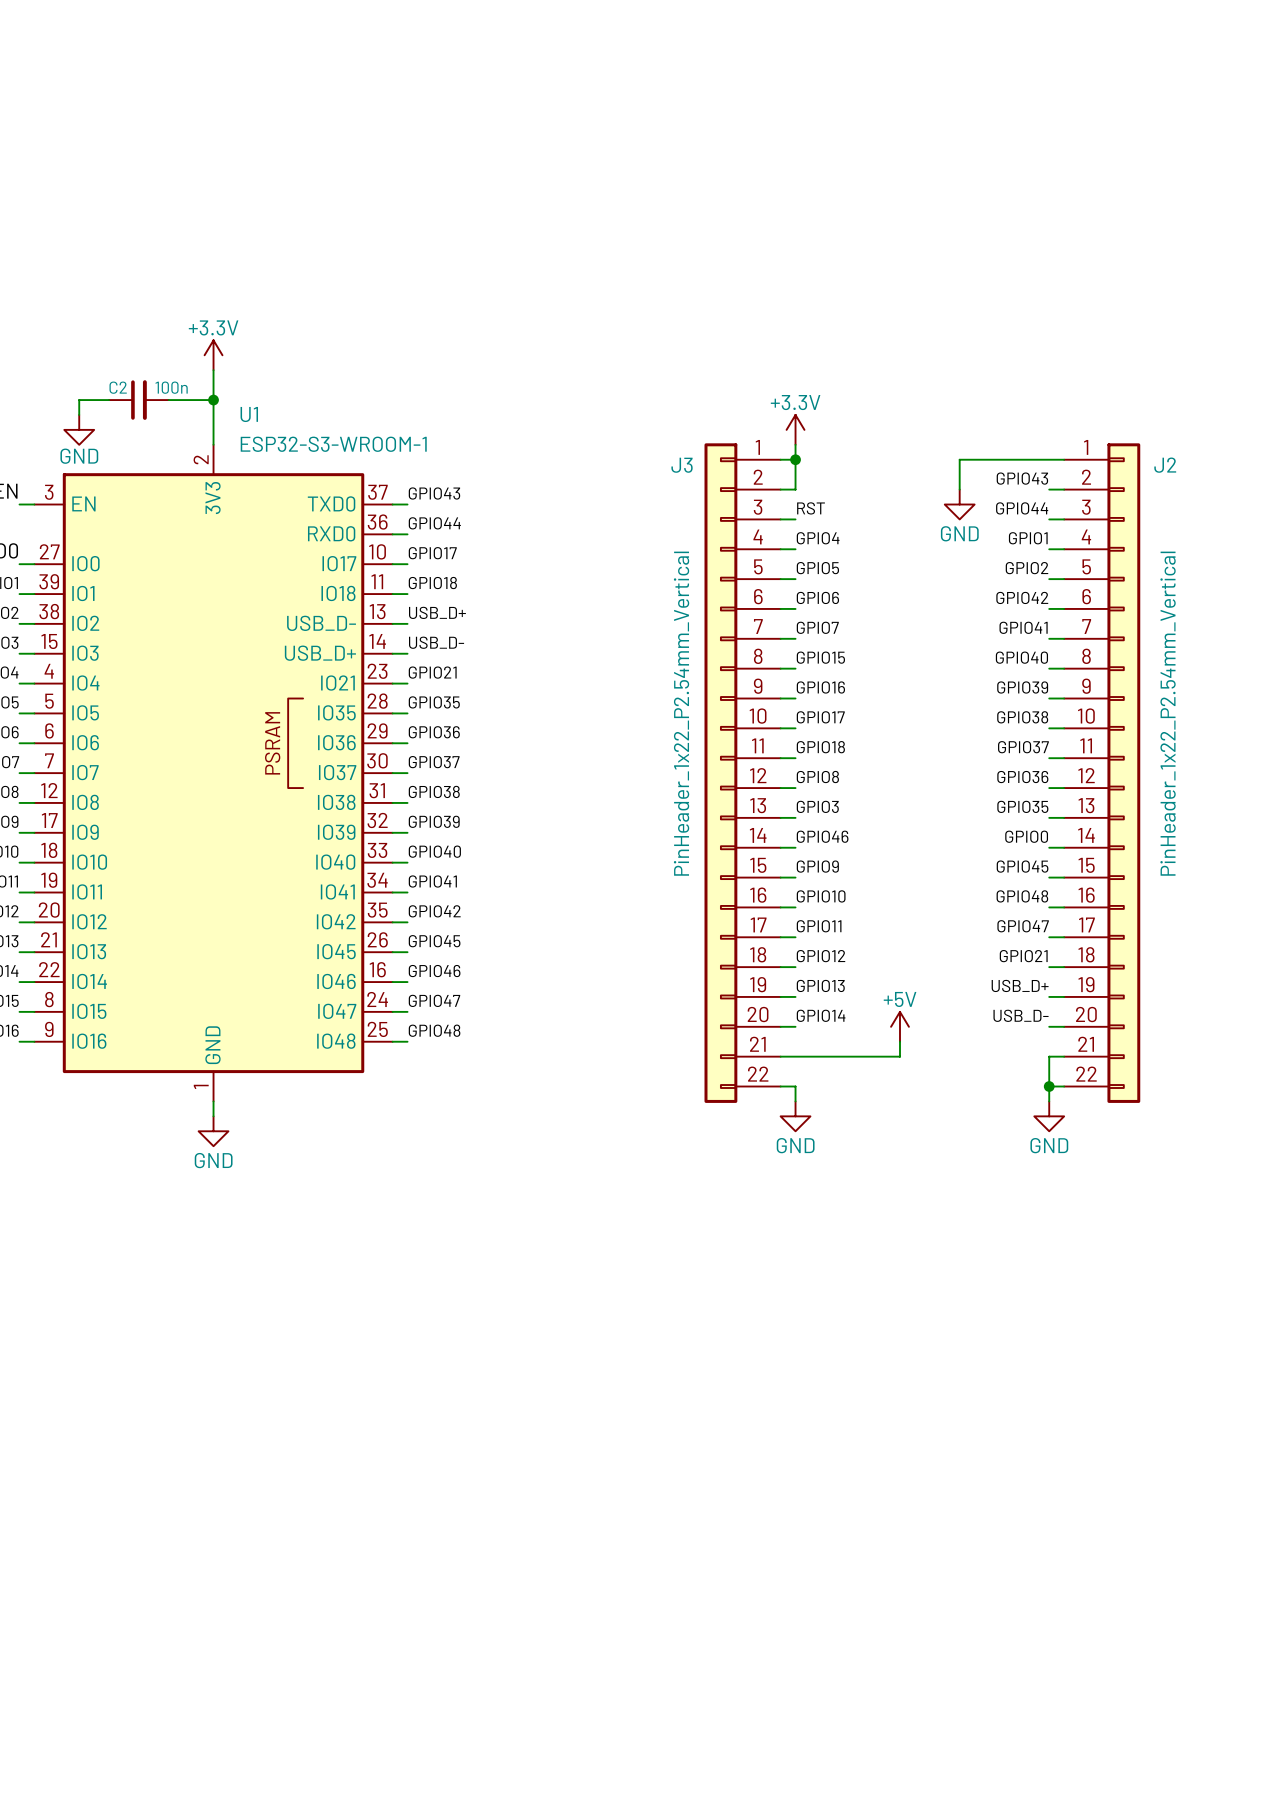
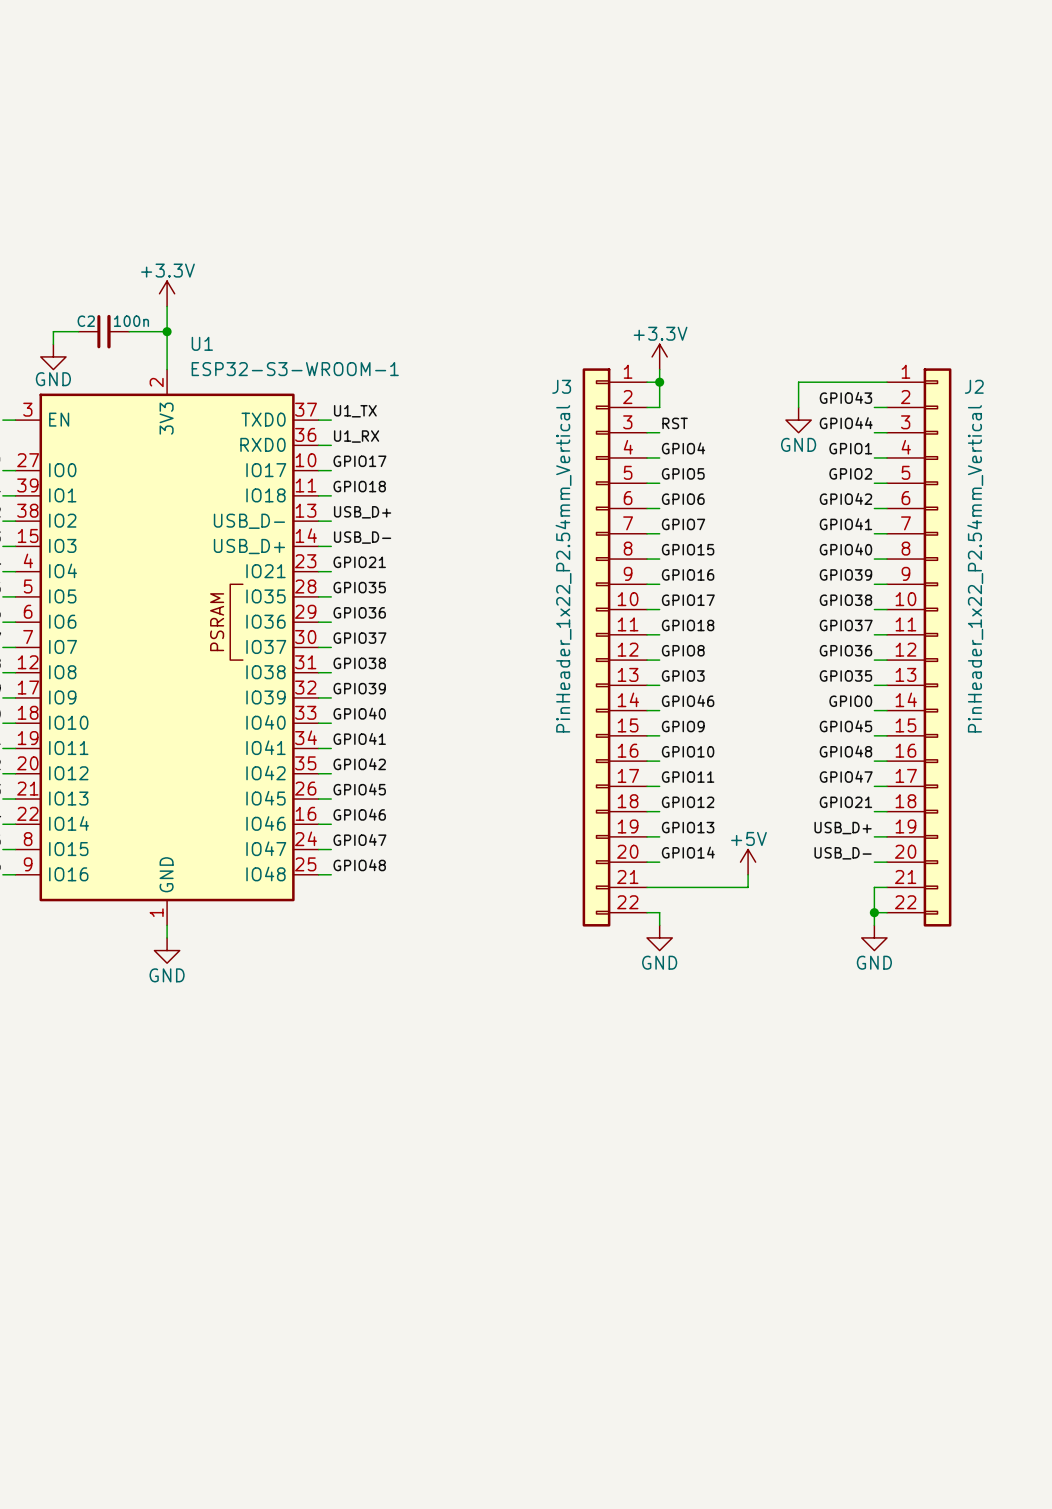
label: GPIO43 (434, 493) -> U1_TX (355, 411)
label: GPIO44 (434, 523) -> U1_RX (356, 436)

